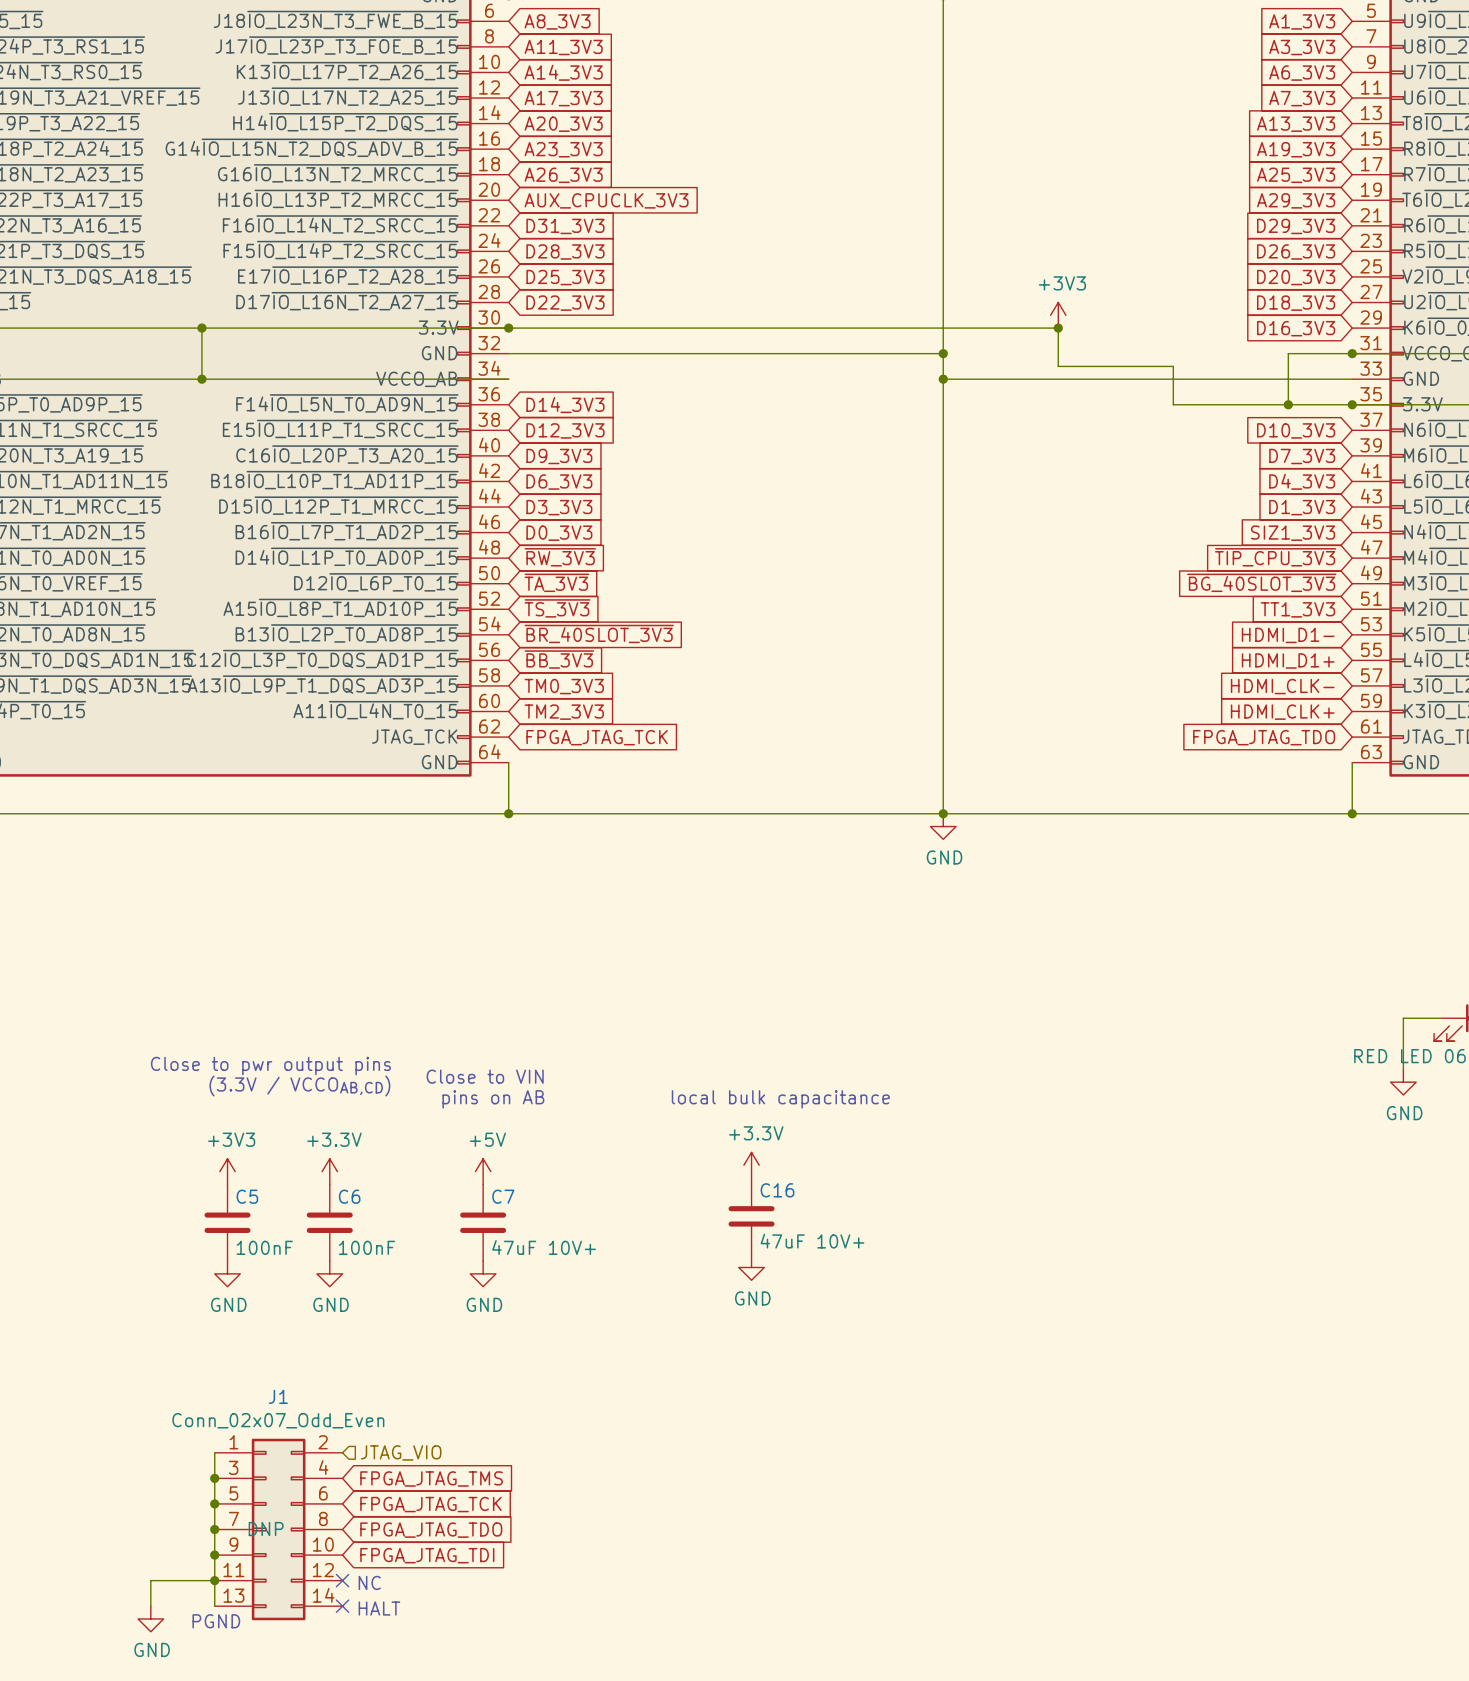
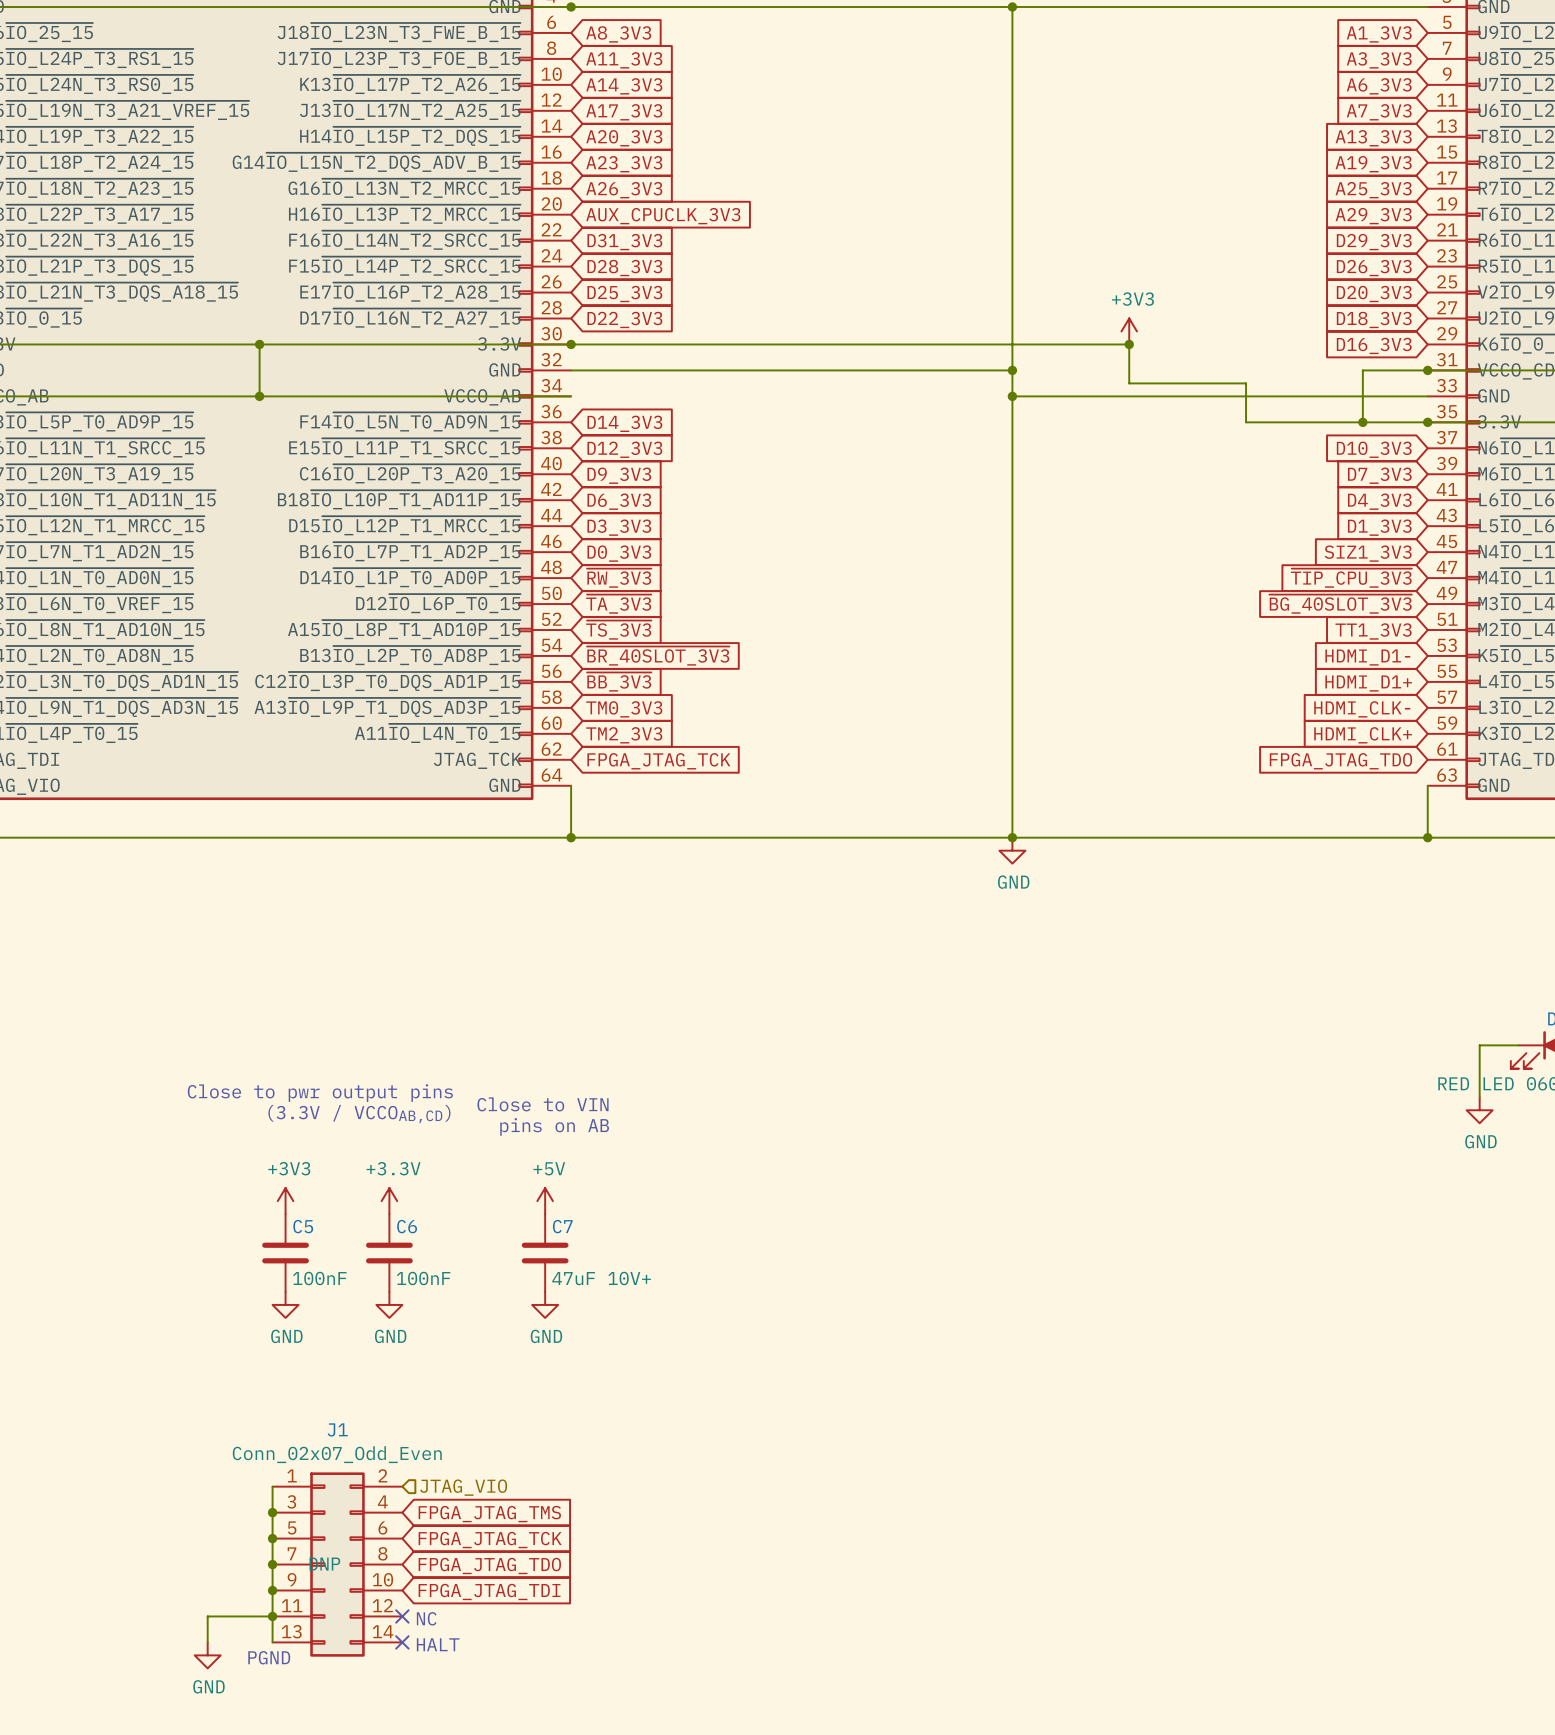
text: local bulk capacitance (780, 1099) -> none
power symbol: +3.3V (751, 1165) -> none
C16: 47uF 10V+ (751, 1216) -> none
power symbol: GND (751, 1267) -> none

